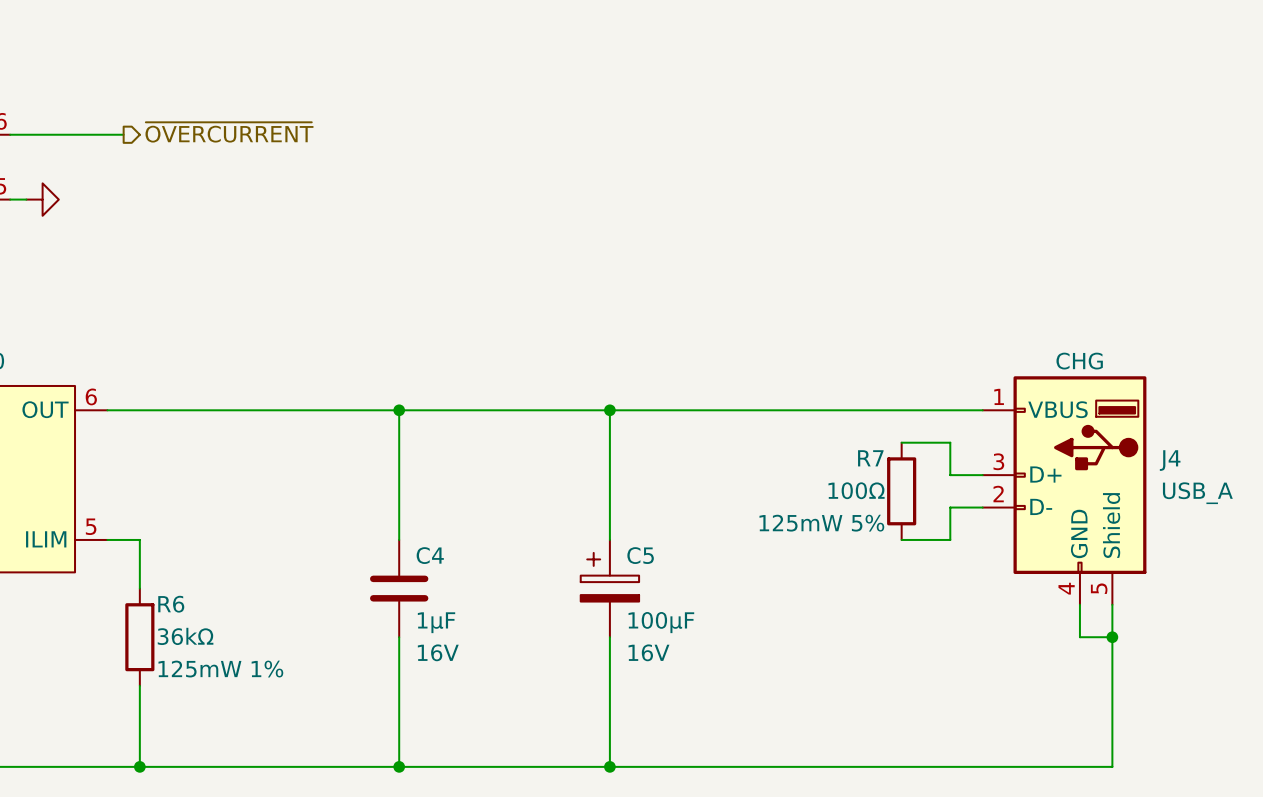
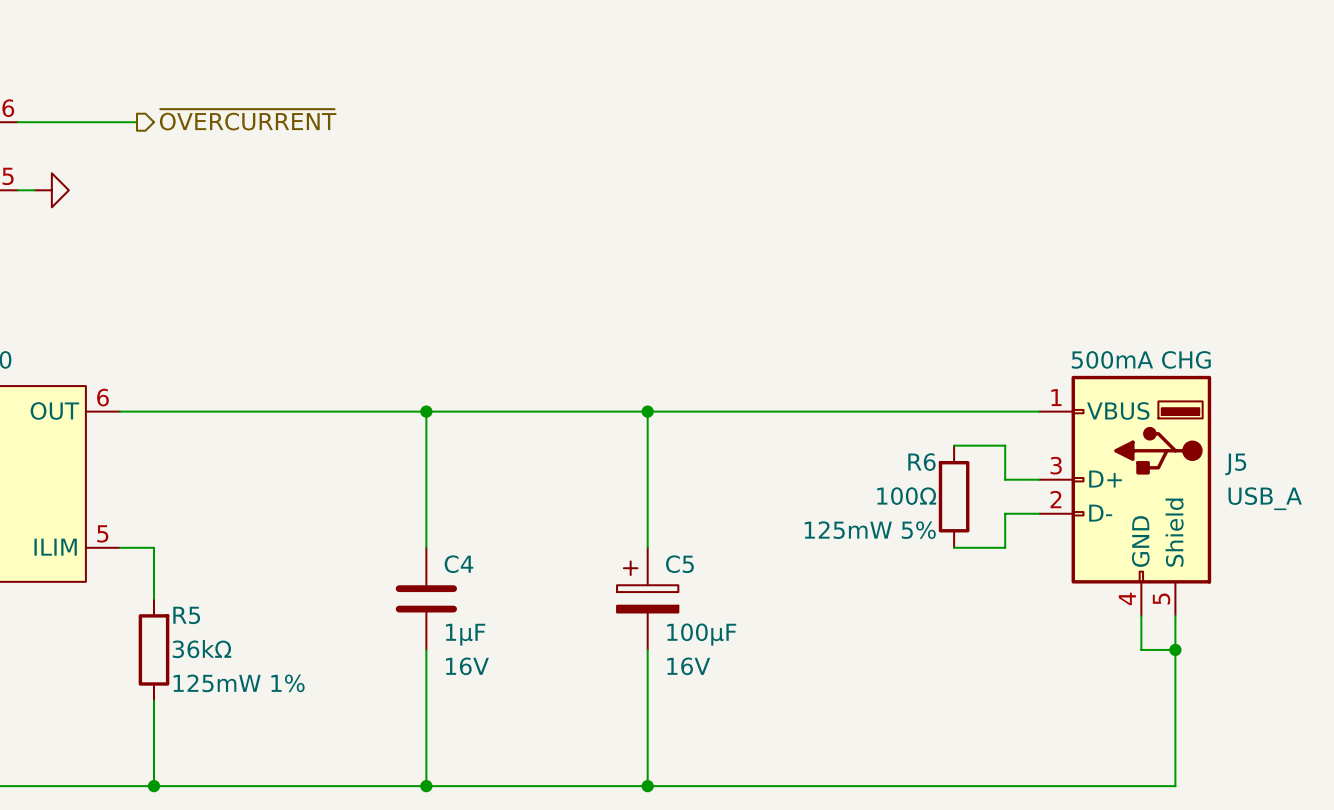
J4 text: CHG (1079, 361) -> 500mA CHG (1141, 359)
R7 name: R7 (870, 458) -> R6 (921, 462)
J4 name: J4 (1170, 460) -> J5 (1235, 464)
R6 name: R6 (171, 604) -> R5 (186, 615)

